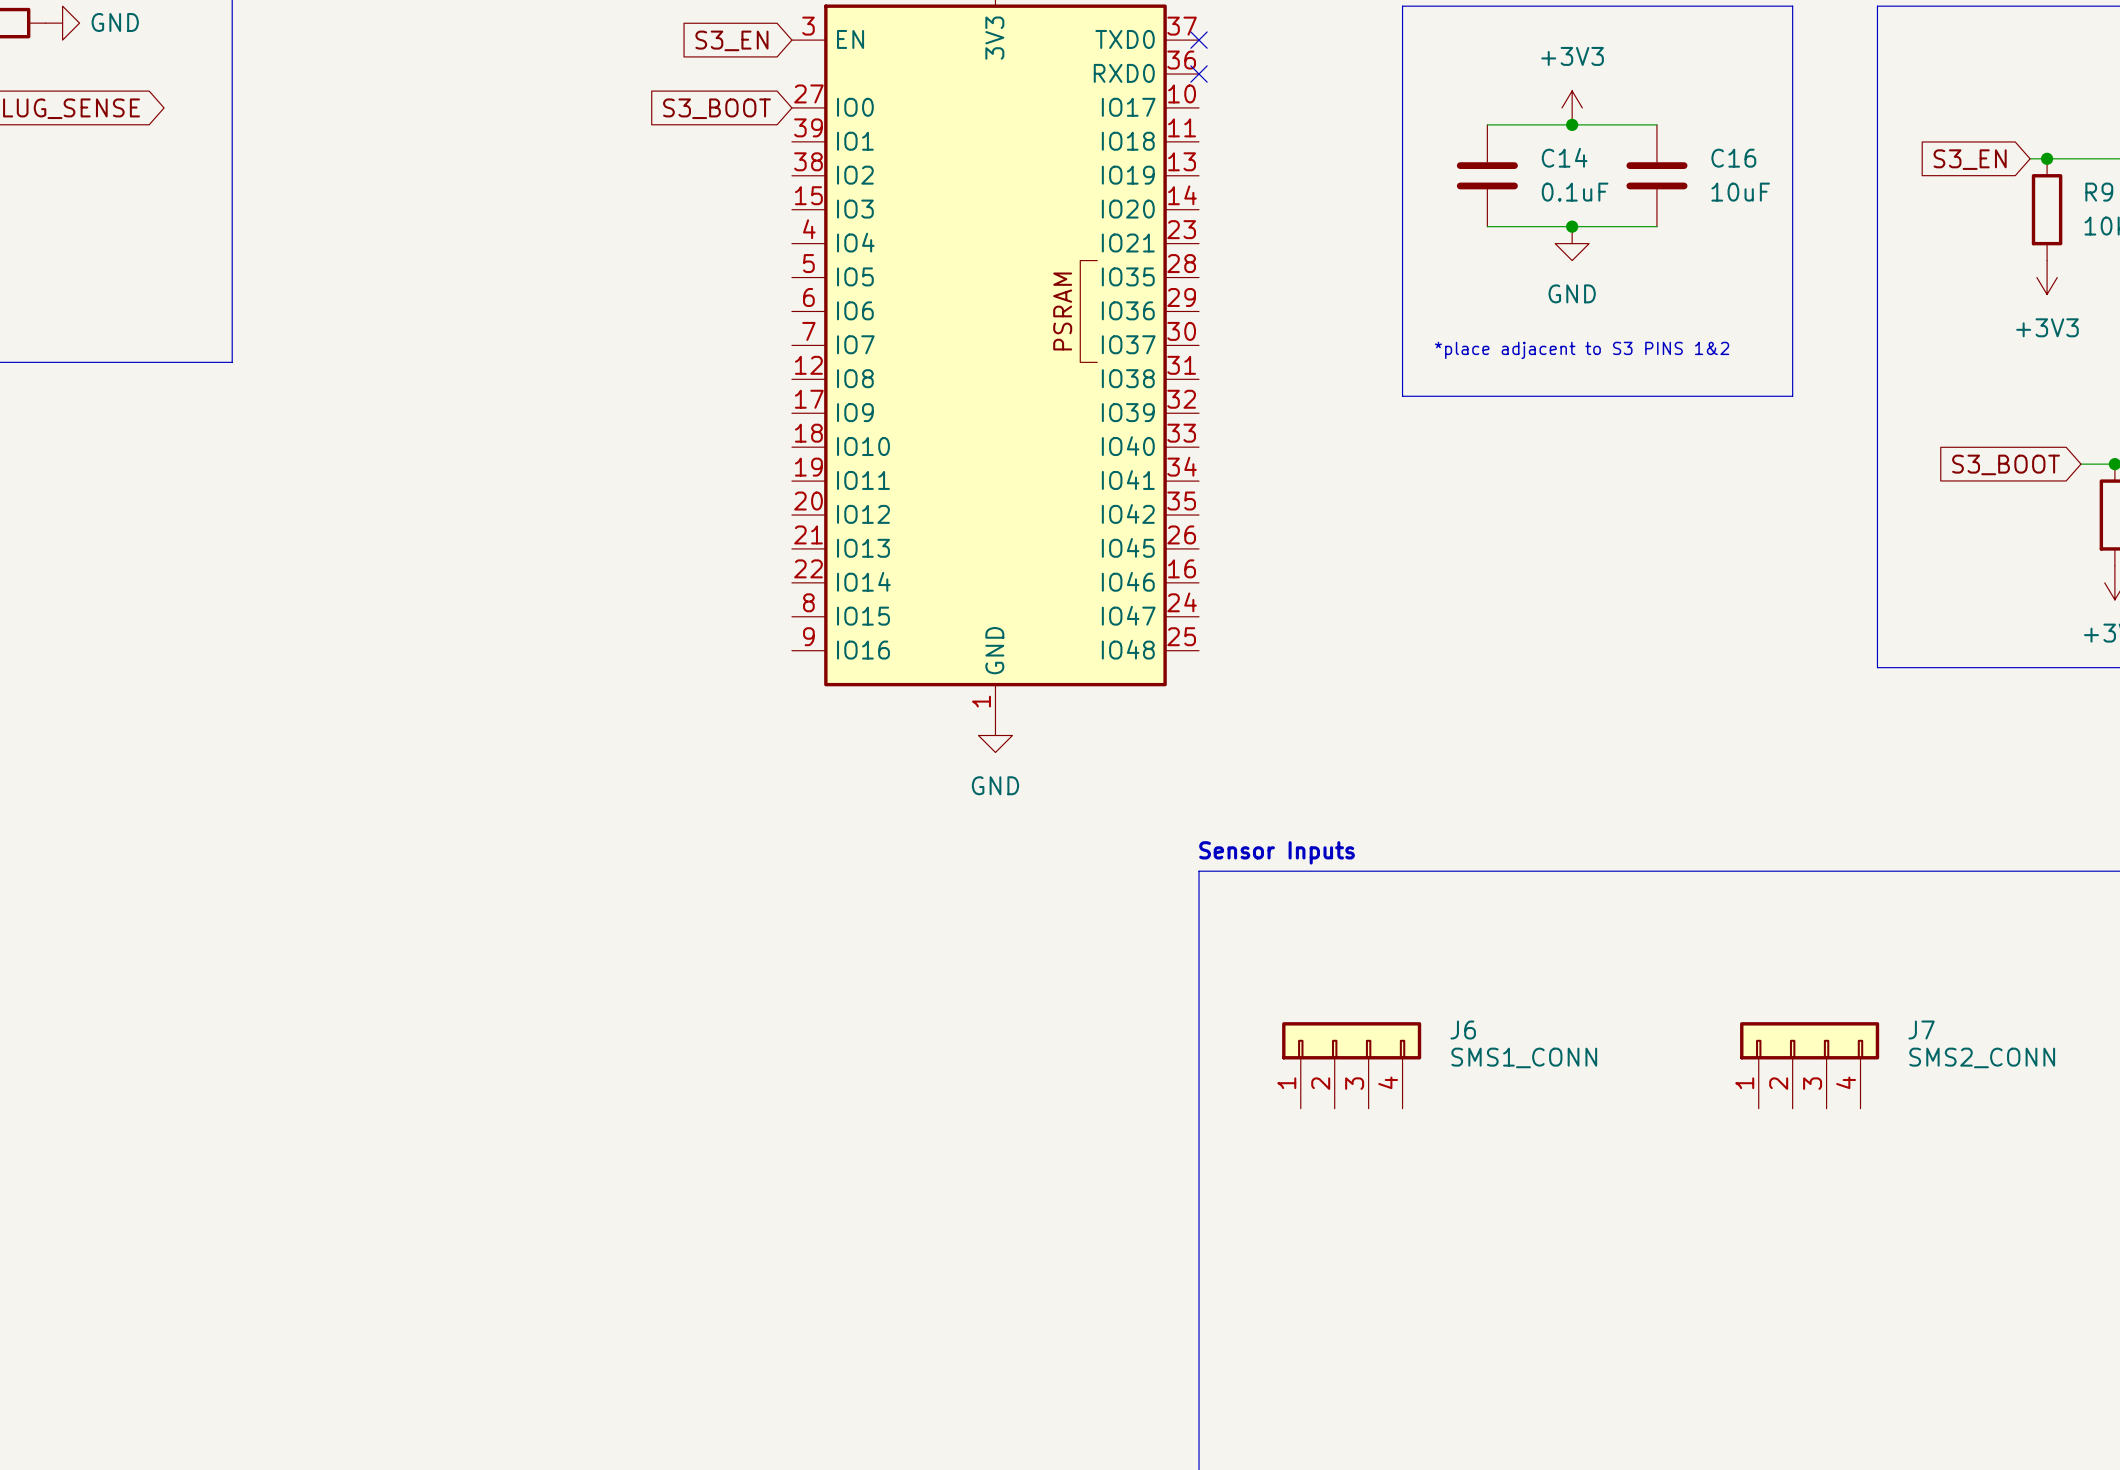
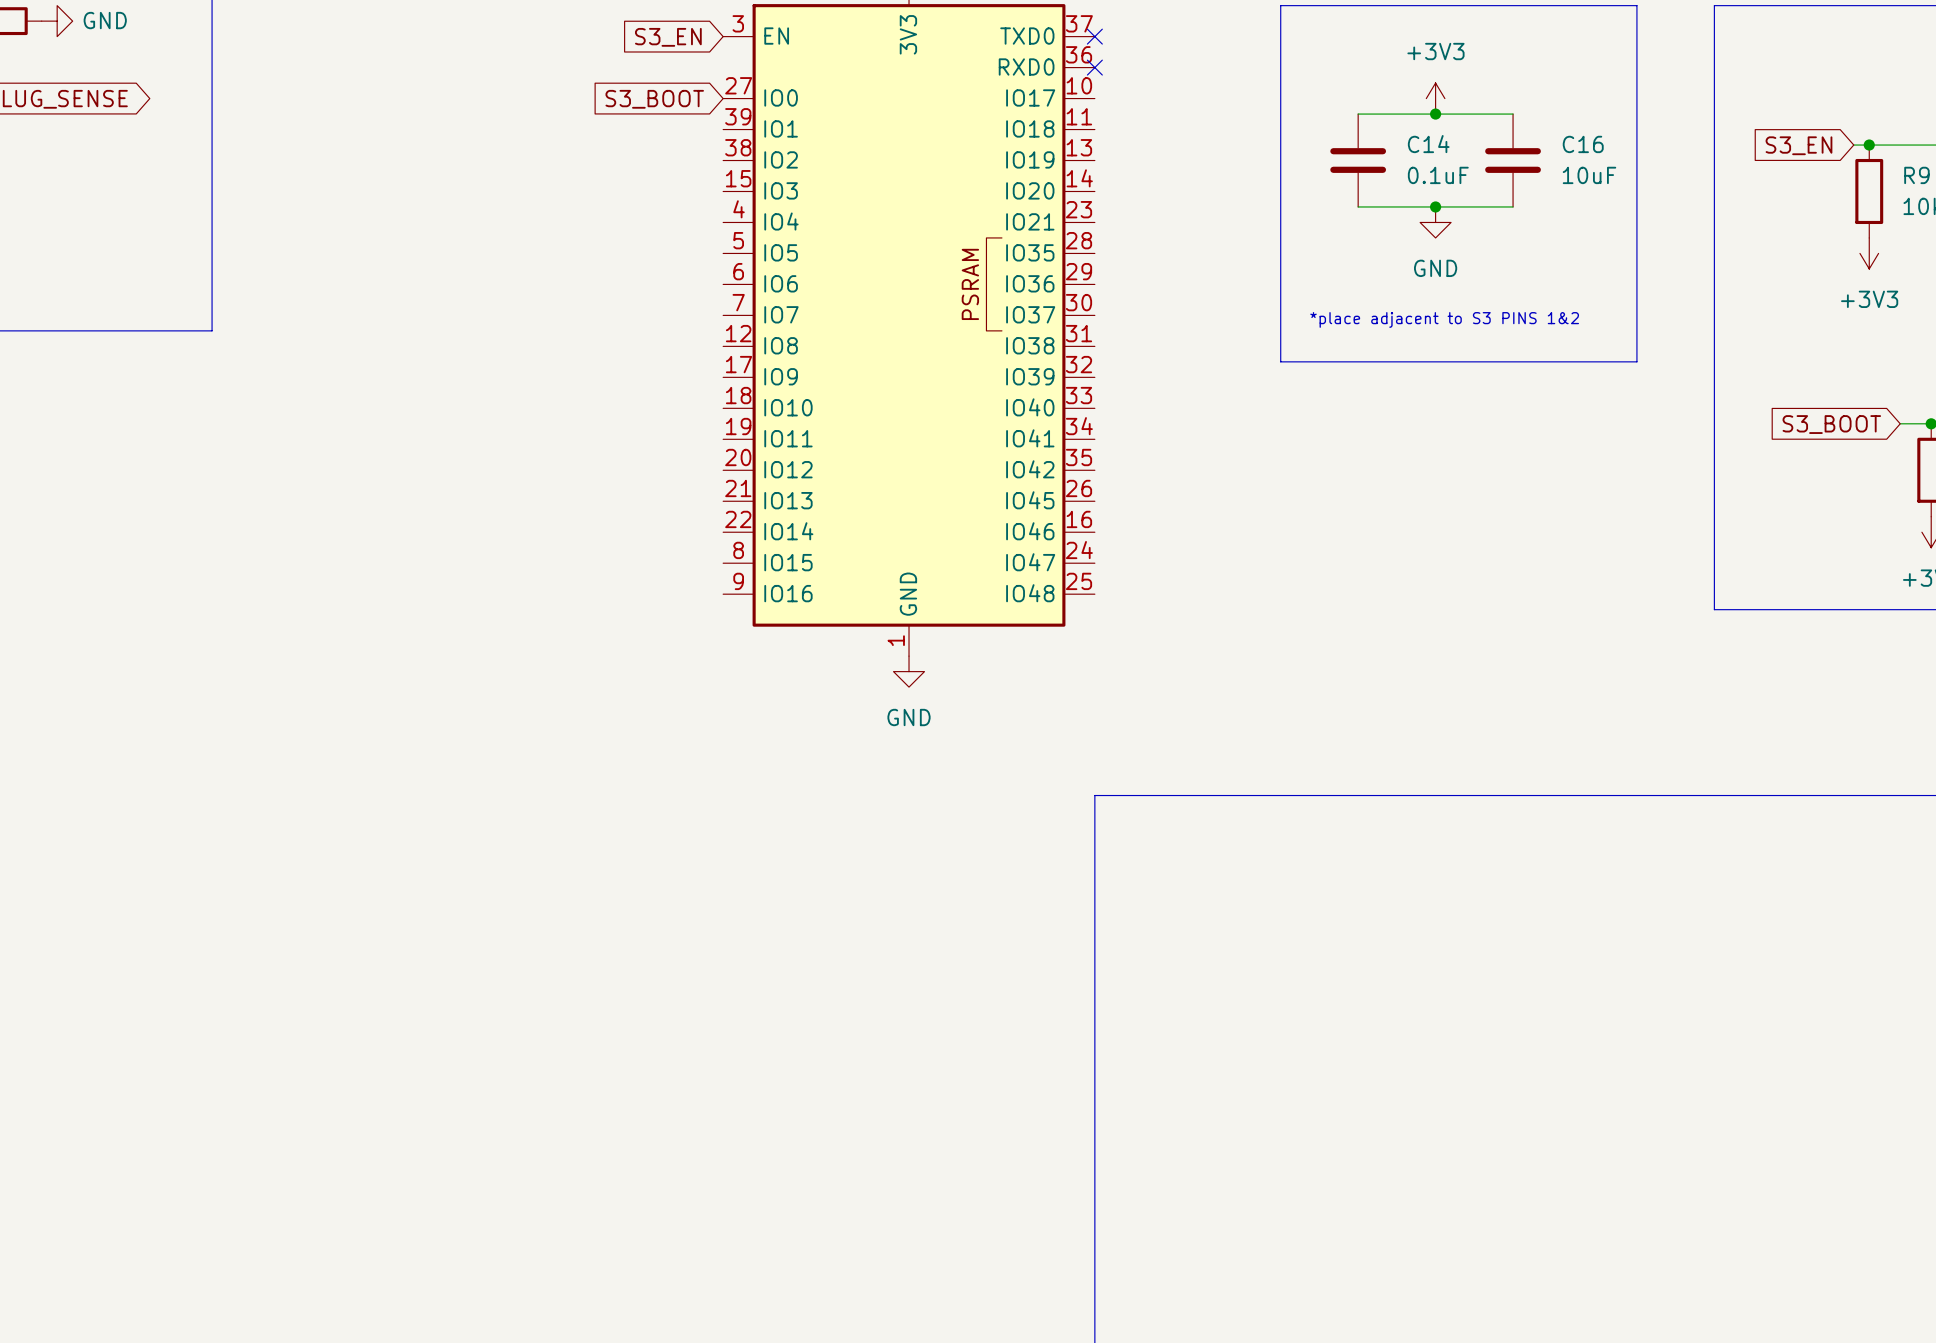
text: Sensor Inputs (1277, 852) -> none
J6: SMS1_CONN (1351, 1065) -> none
J7: SMS2_CONN (1809, 1065) -> none

